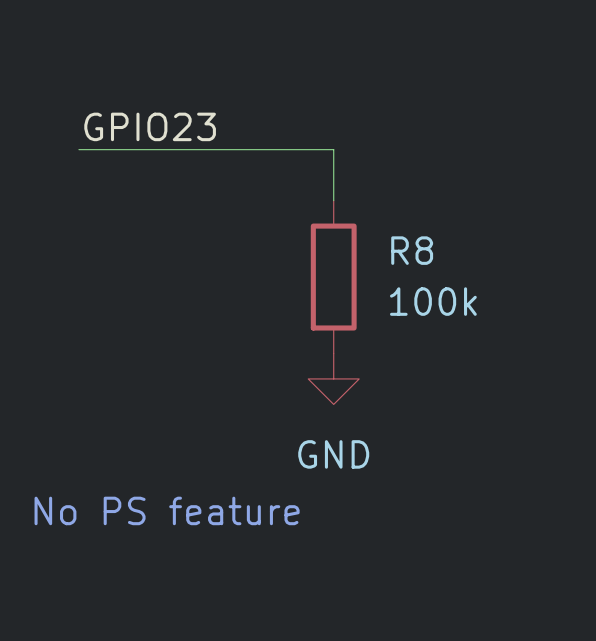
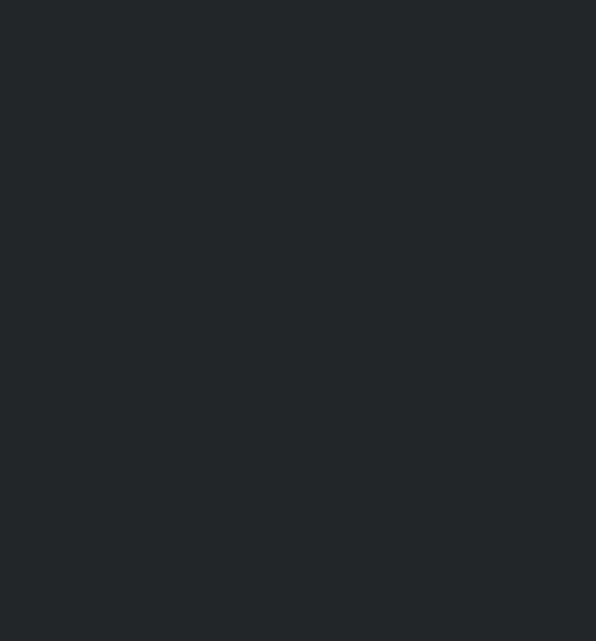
label: GPIO23 (150, 126) -> none
wire: (78, 149) (333, 149) (333, 200) -> none
R8: 100k (333, 277) -> none
power symbol: GND (333, 378) -> none
text: No PS feature (167, 510) -> none

